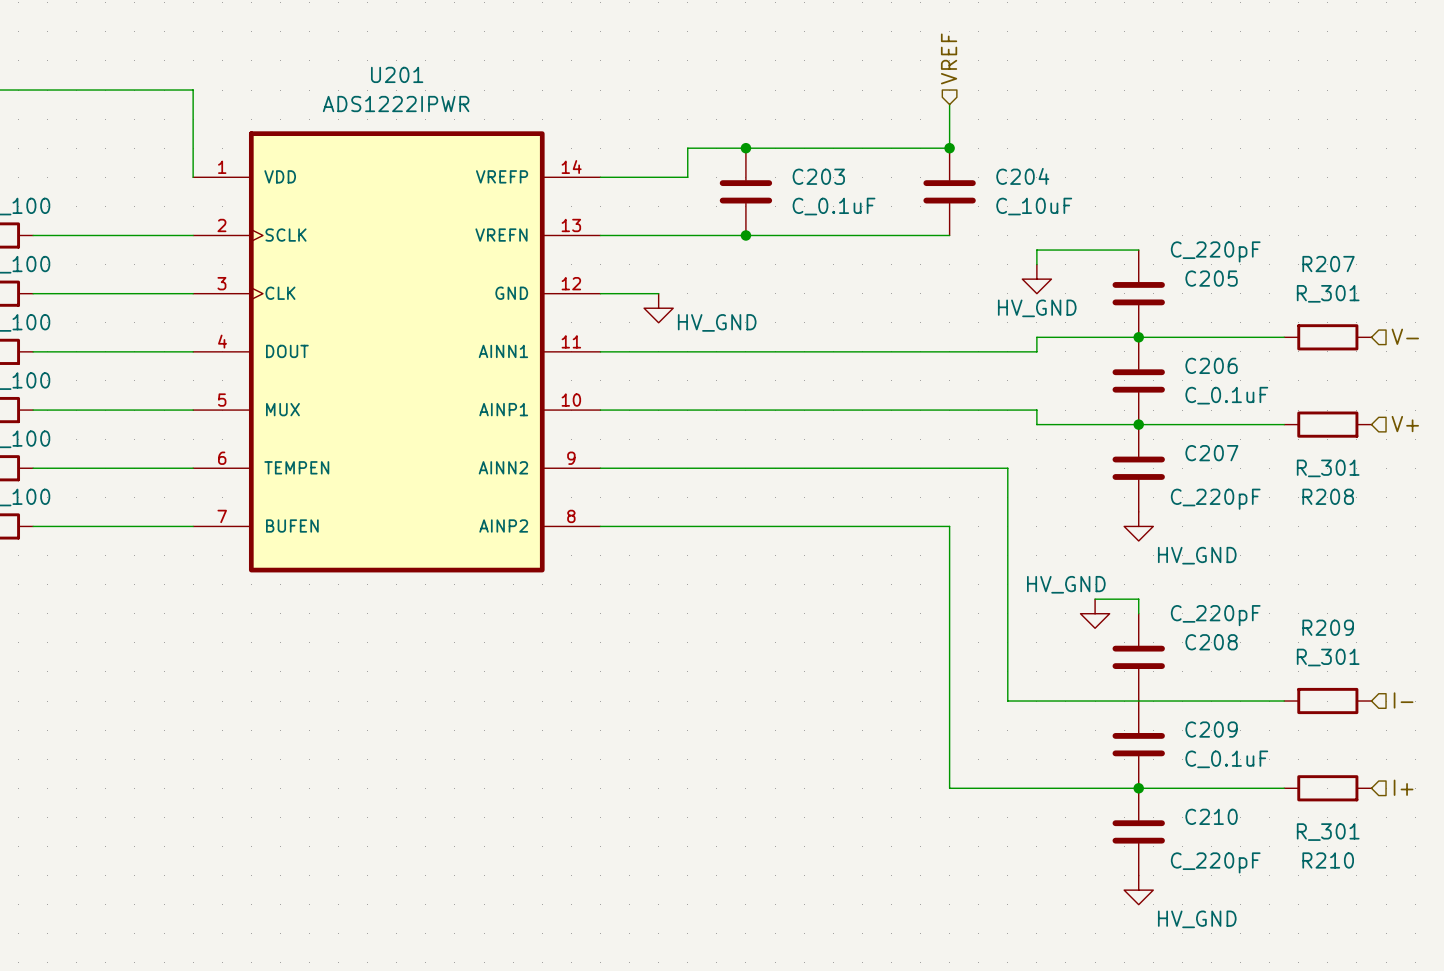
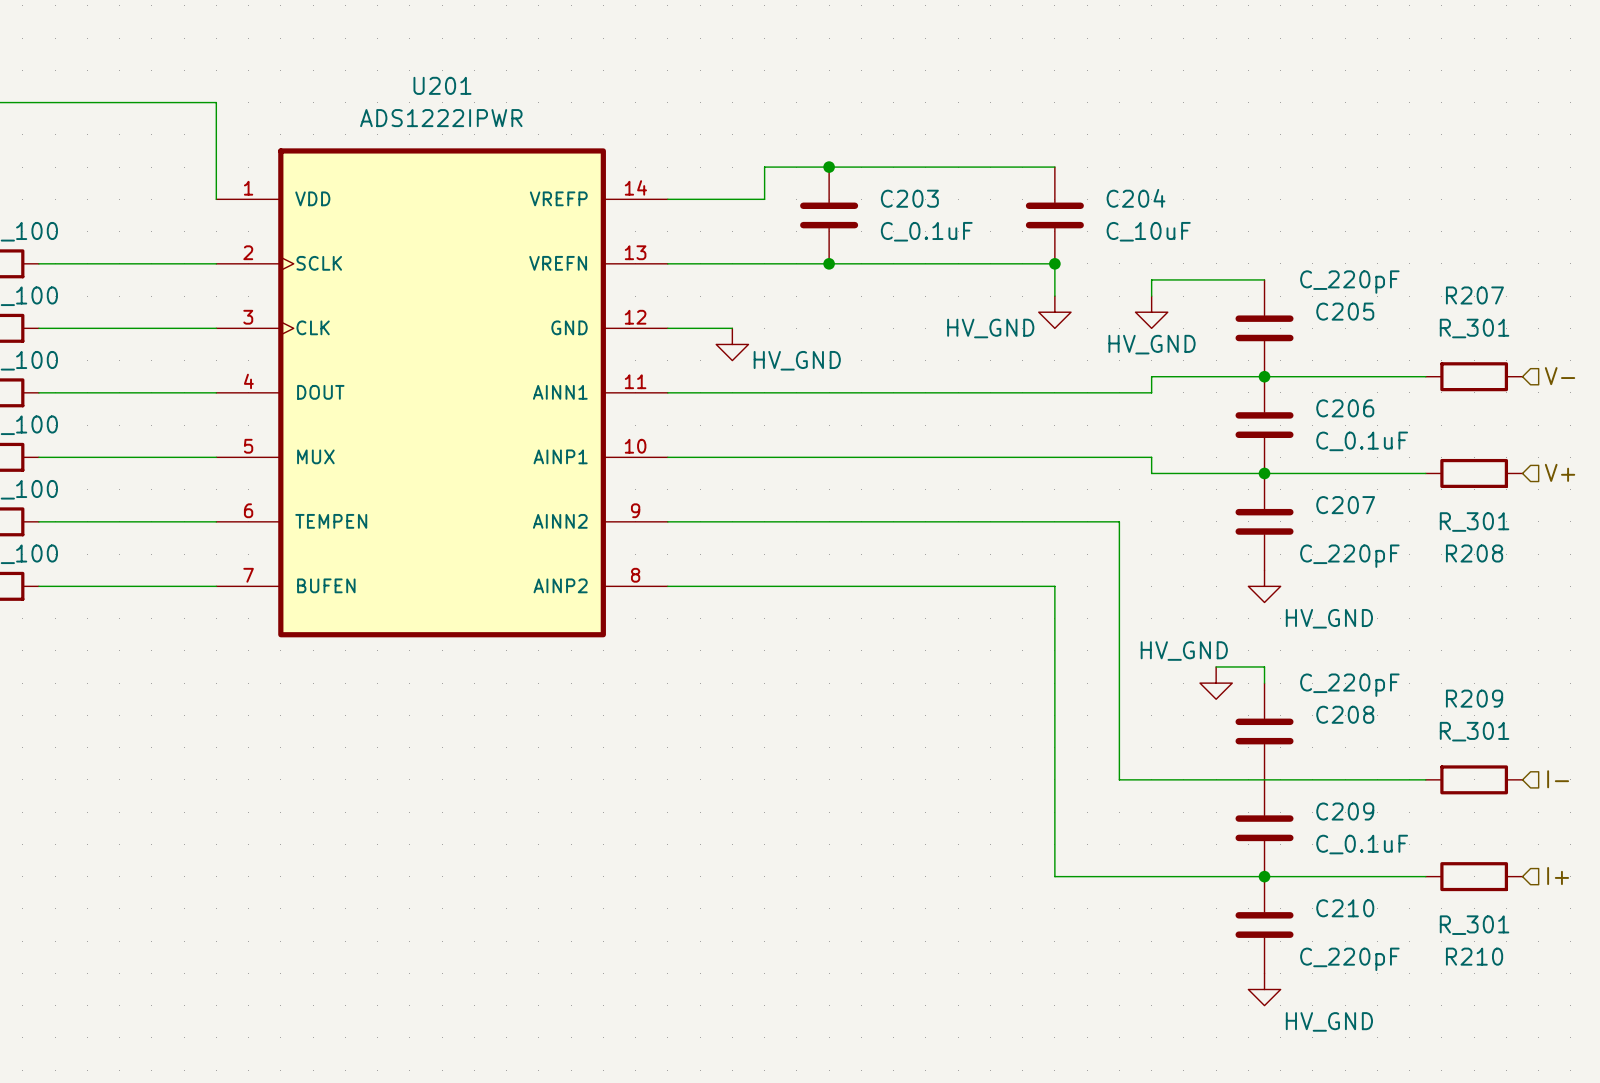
hierarchical label: VREF (949, 58) -> none
wire: (949, 104) (949, 148) -> none
junction: (949, 148) -> none
wire: none -> (1054, 263) (1054, 296)
junction: none -> (1054, 263)
power symbol: none -> HV_GND (1054, 312)

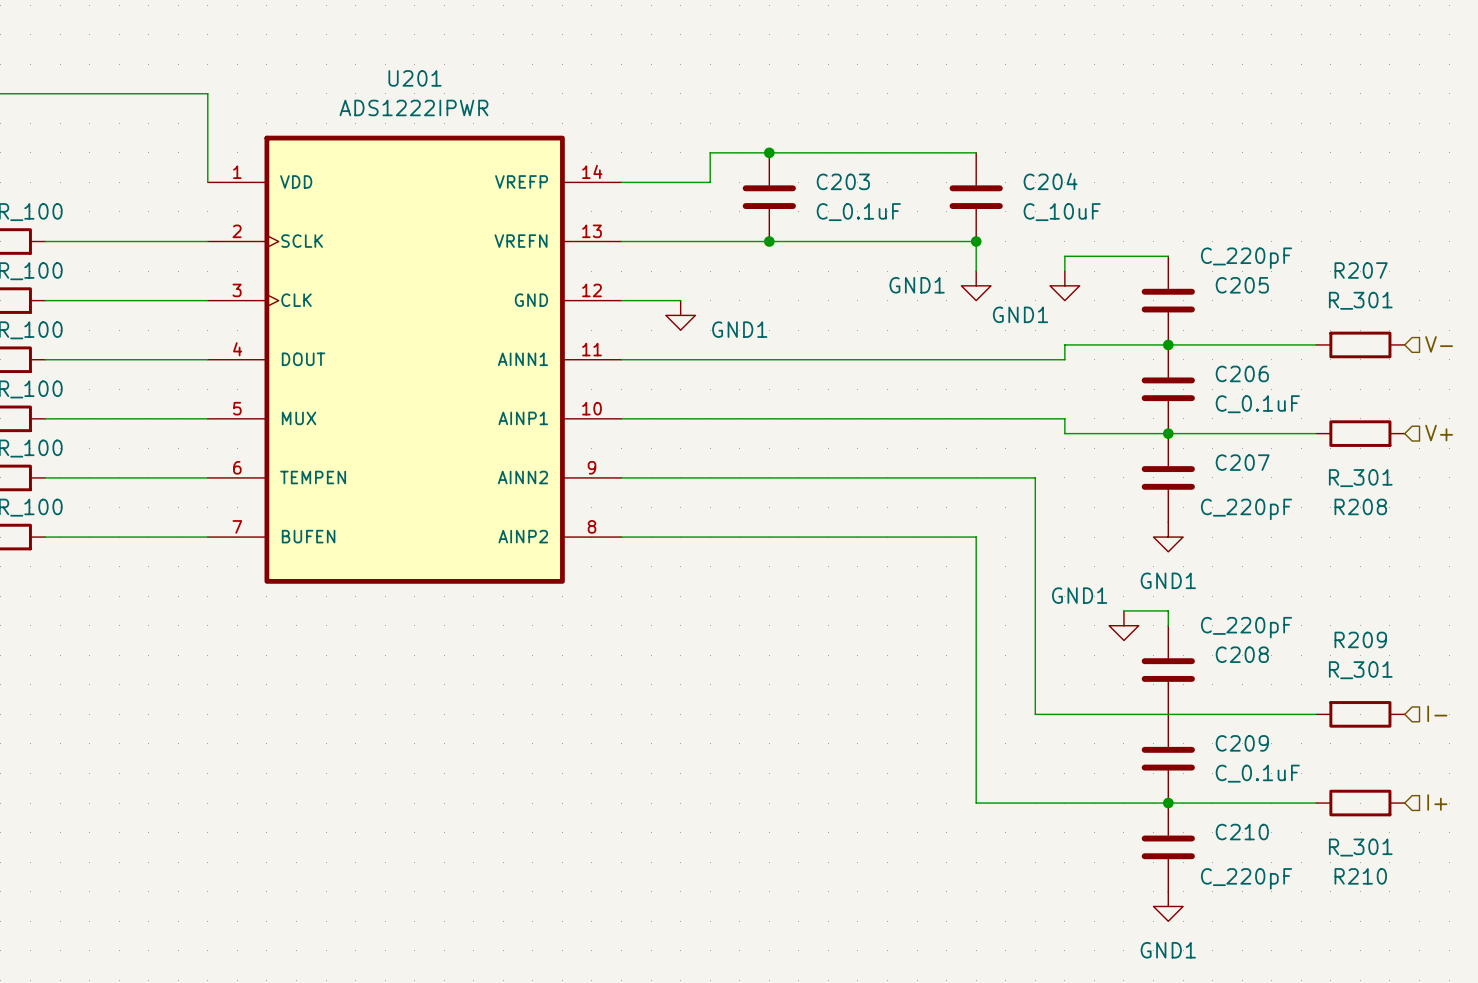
power symbol: HV_GND (1054, 312) -> GND1 (976, 285)
power symbol: HV_GND (1151, 312) -> GND1 (1064, 285)
power symbol: HV_GND (732, 344) -> GND1 (680, 315)
power symbol: HV_GND (1264, 586) -> GND1 (1168, 537)
power symbol: HV_GND (1216, 683) -> GND1 (1123, 625)
power symbol: HV_GND (1264, 989) -> GND1 (1168, 906)

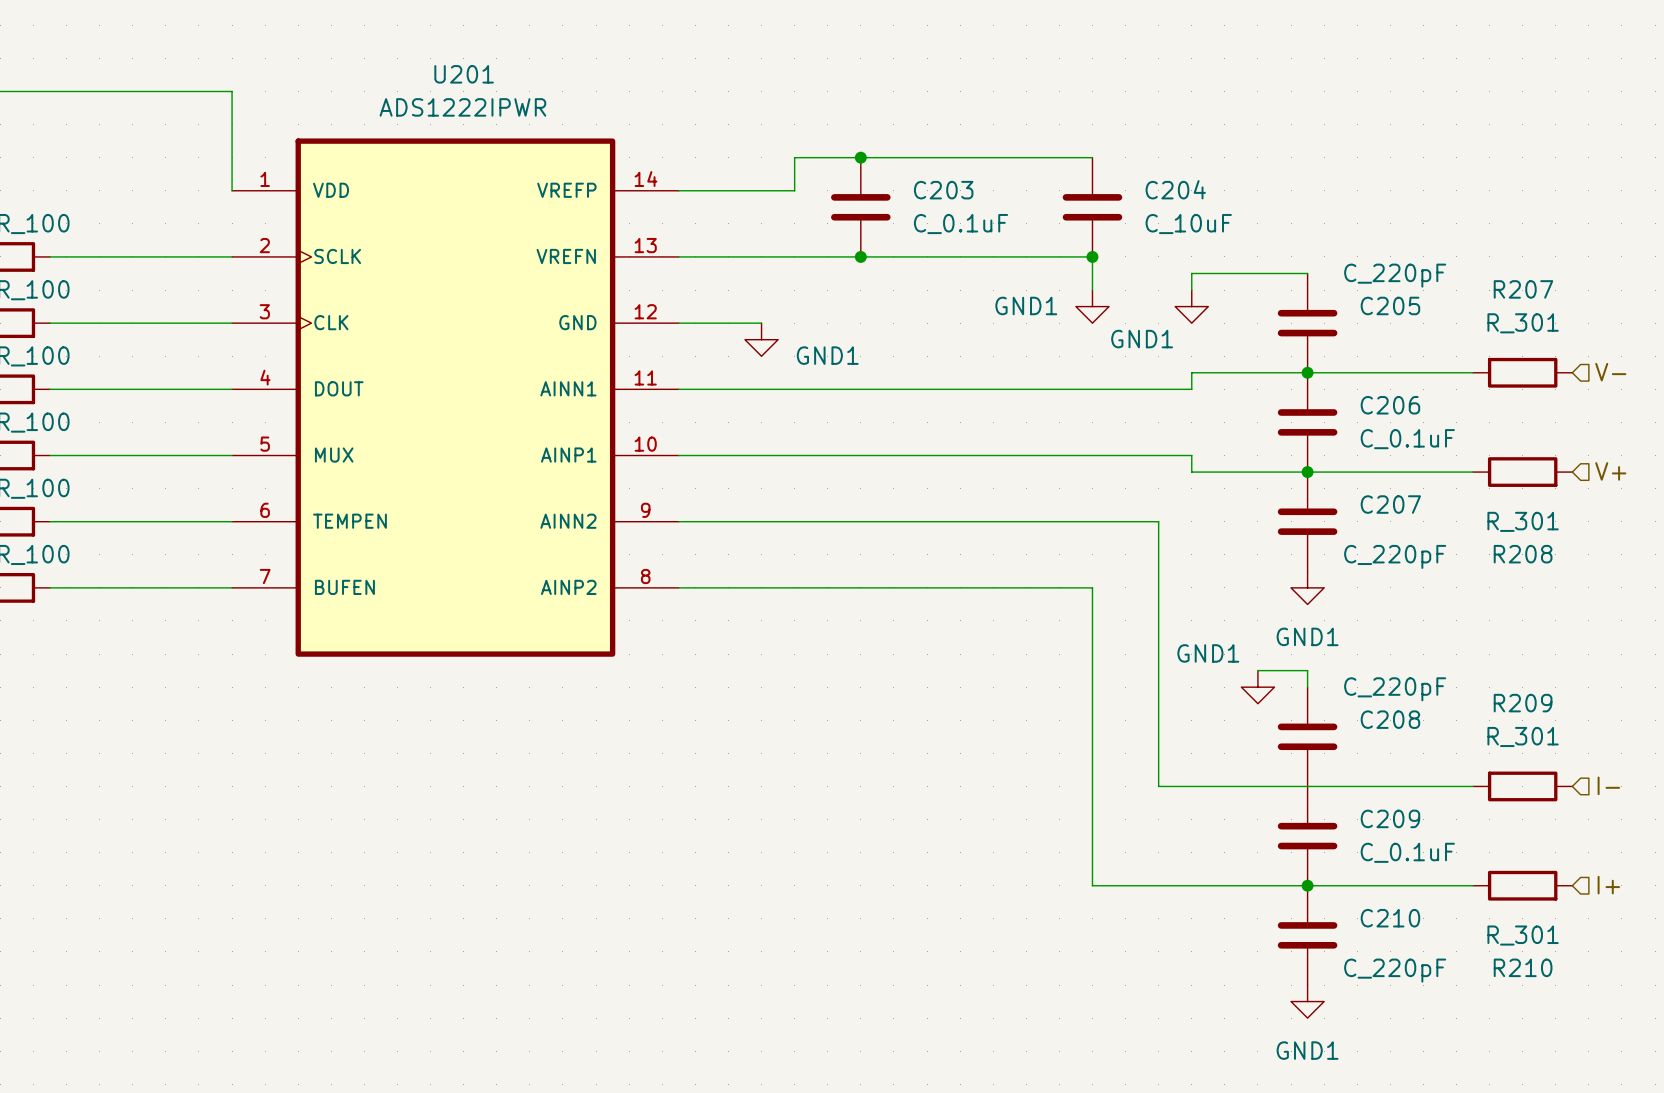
U201 symbol: [207, 135, 622, 584] -> [232, 138, 679, 657]

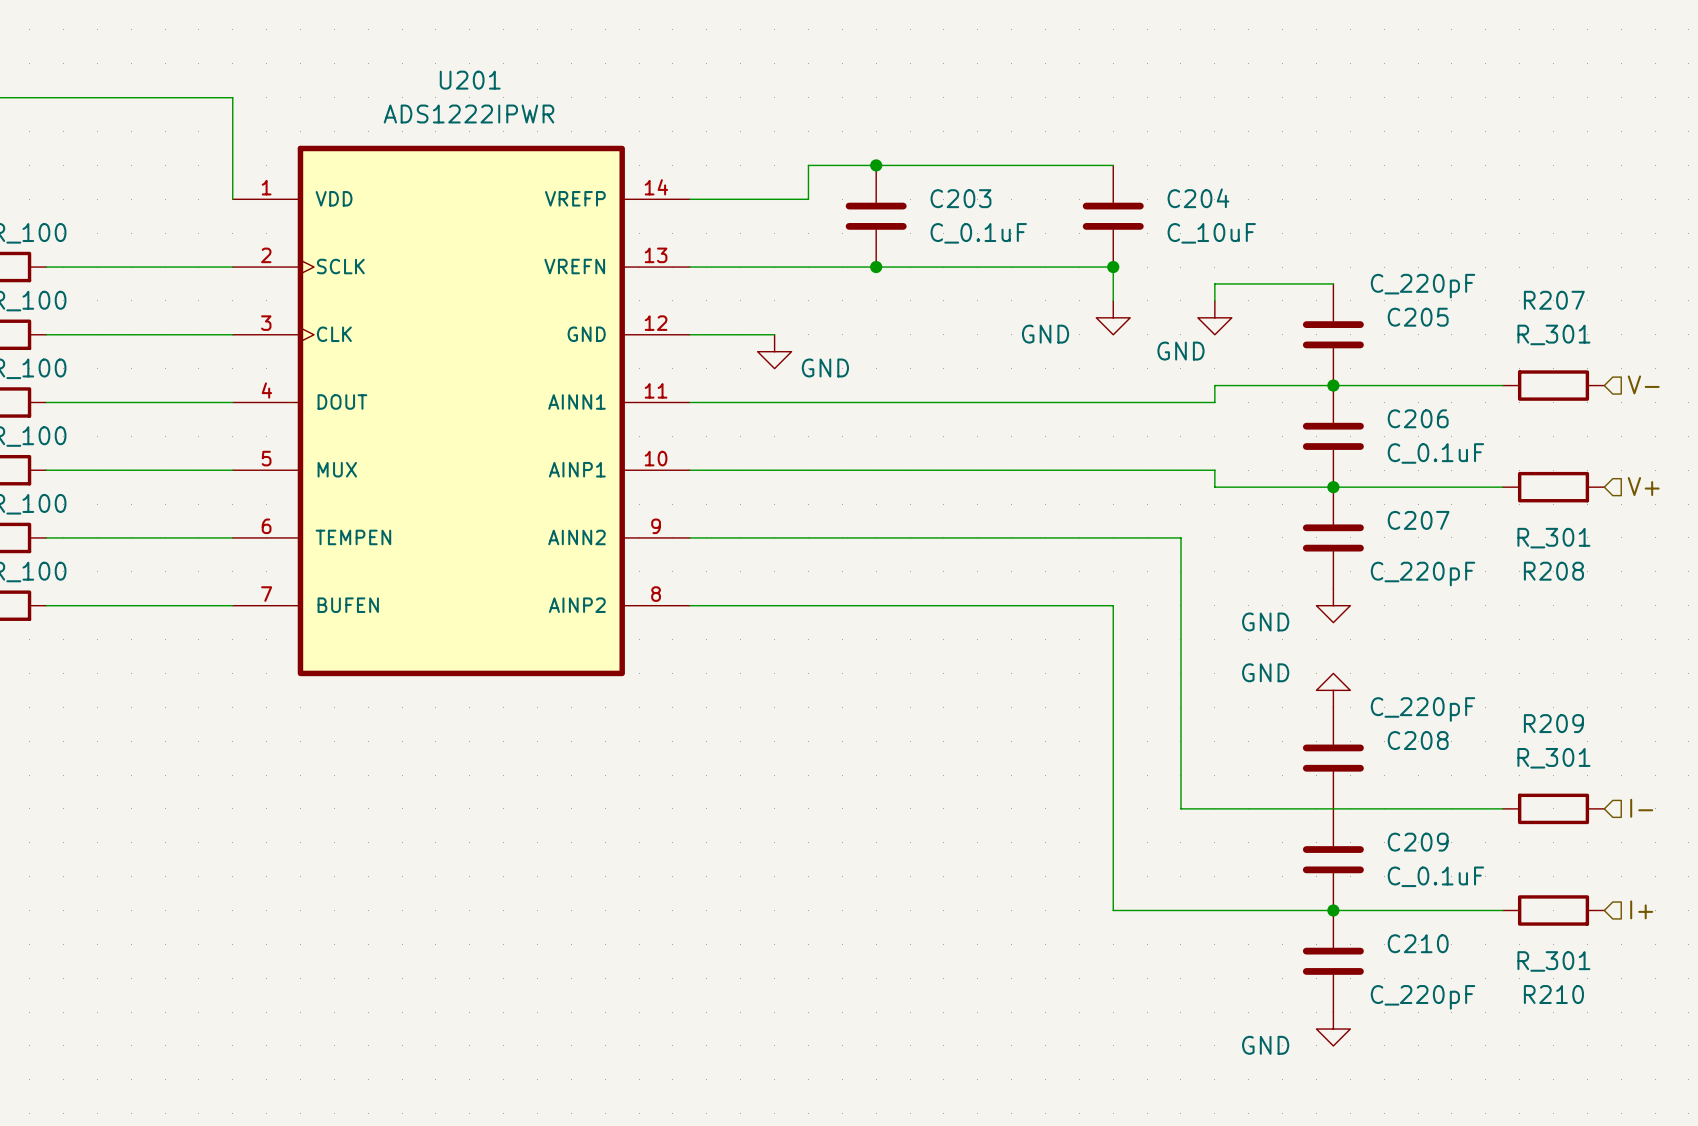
power symbol: GND1 (1092, 306) -> GND (1113, 317)
power symbol: GND1 (1191, 306) -> GND (1214, 317)
power symbol: GND1 (761, 339) -> GND (774, 351)
power symbol: GND1 (1307, 587) -> GND (1333, 605)
wire: (1257, 670) (1307, 670) (1307, 687) -> none
power symbol: none -> GND (1333, 690)
power symbol: GND1 (1257, 687) -> none
power symbol: GND1 (1307, 1001) -> GND (1333, 1029)

